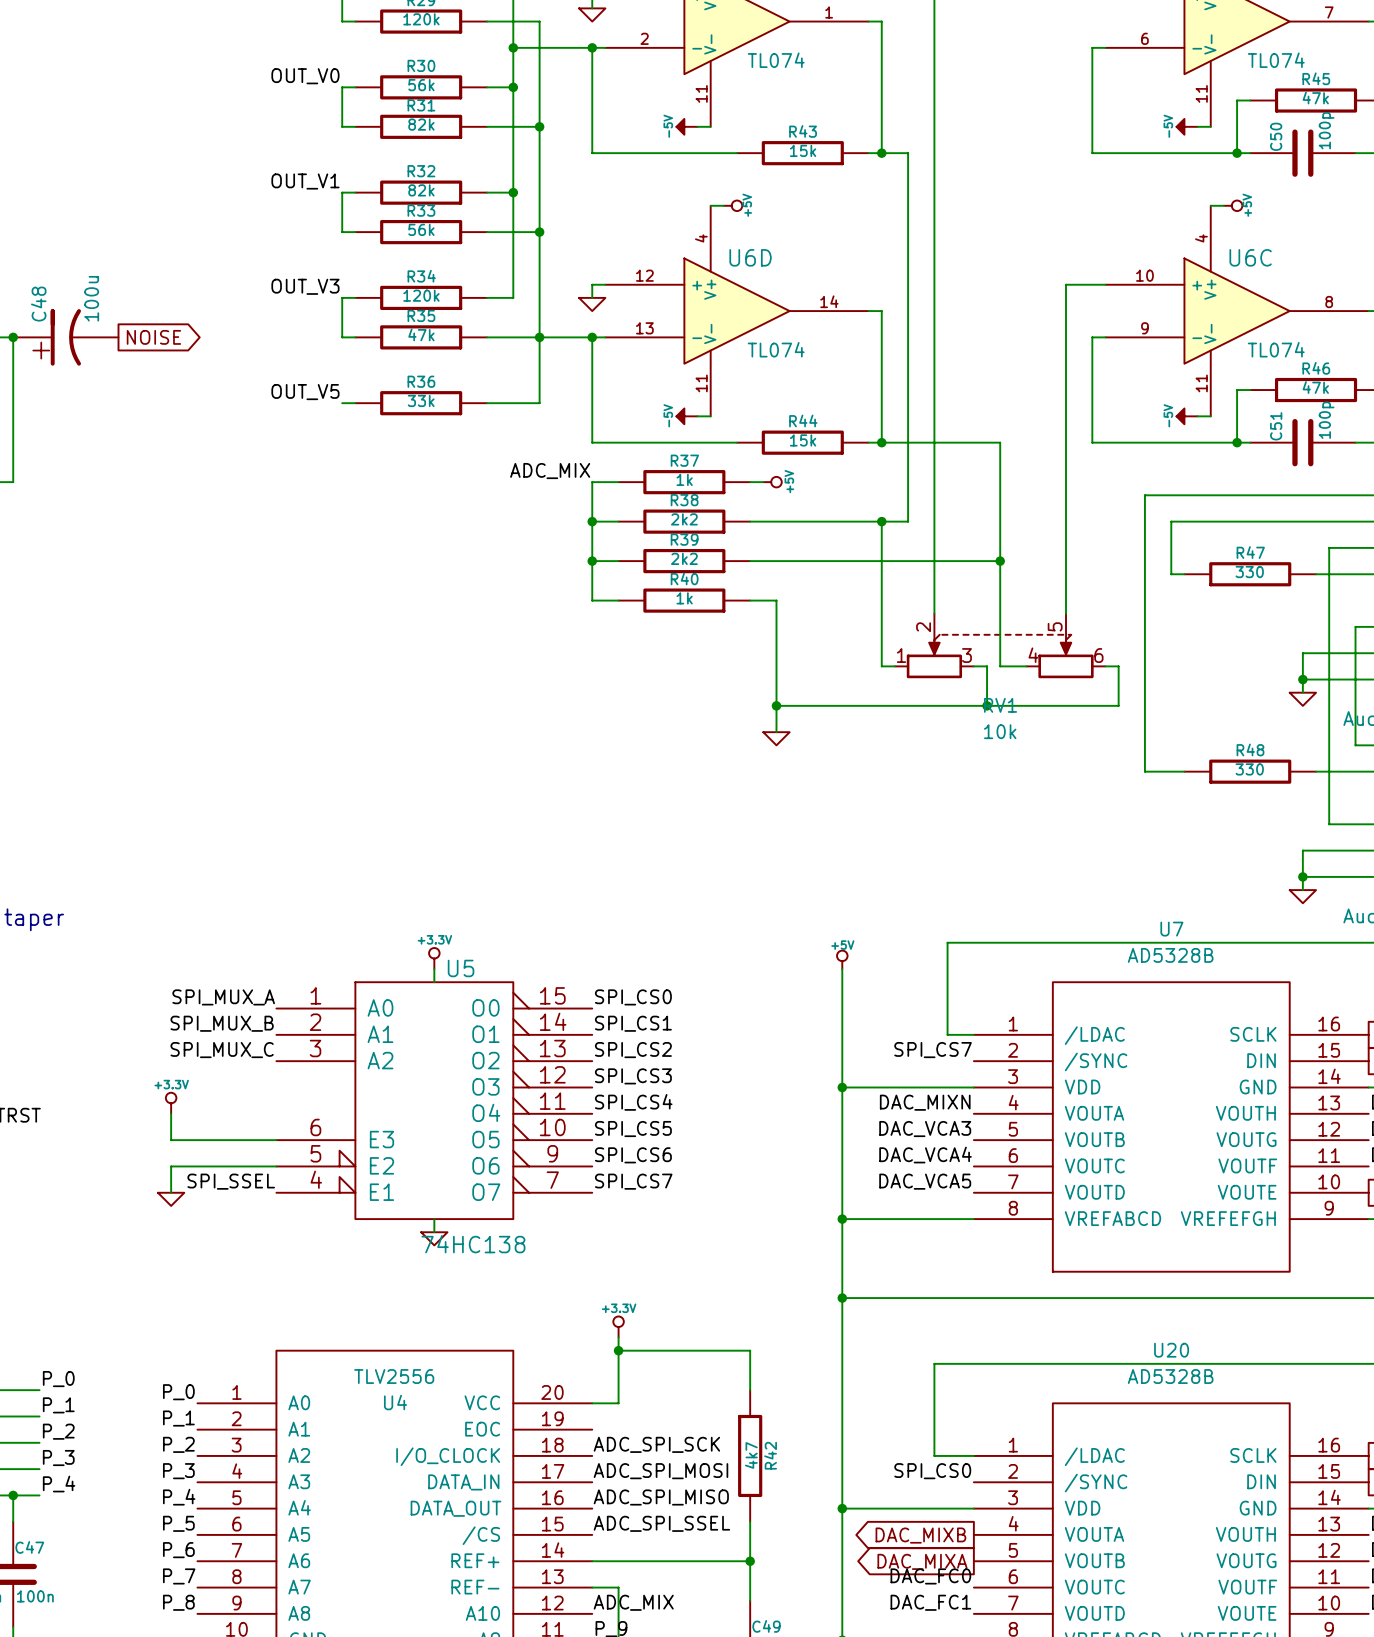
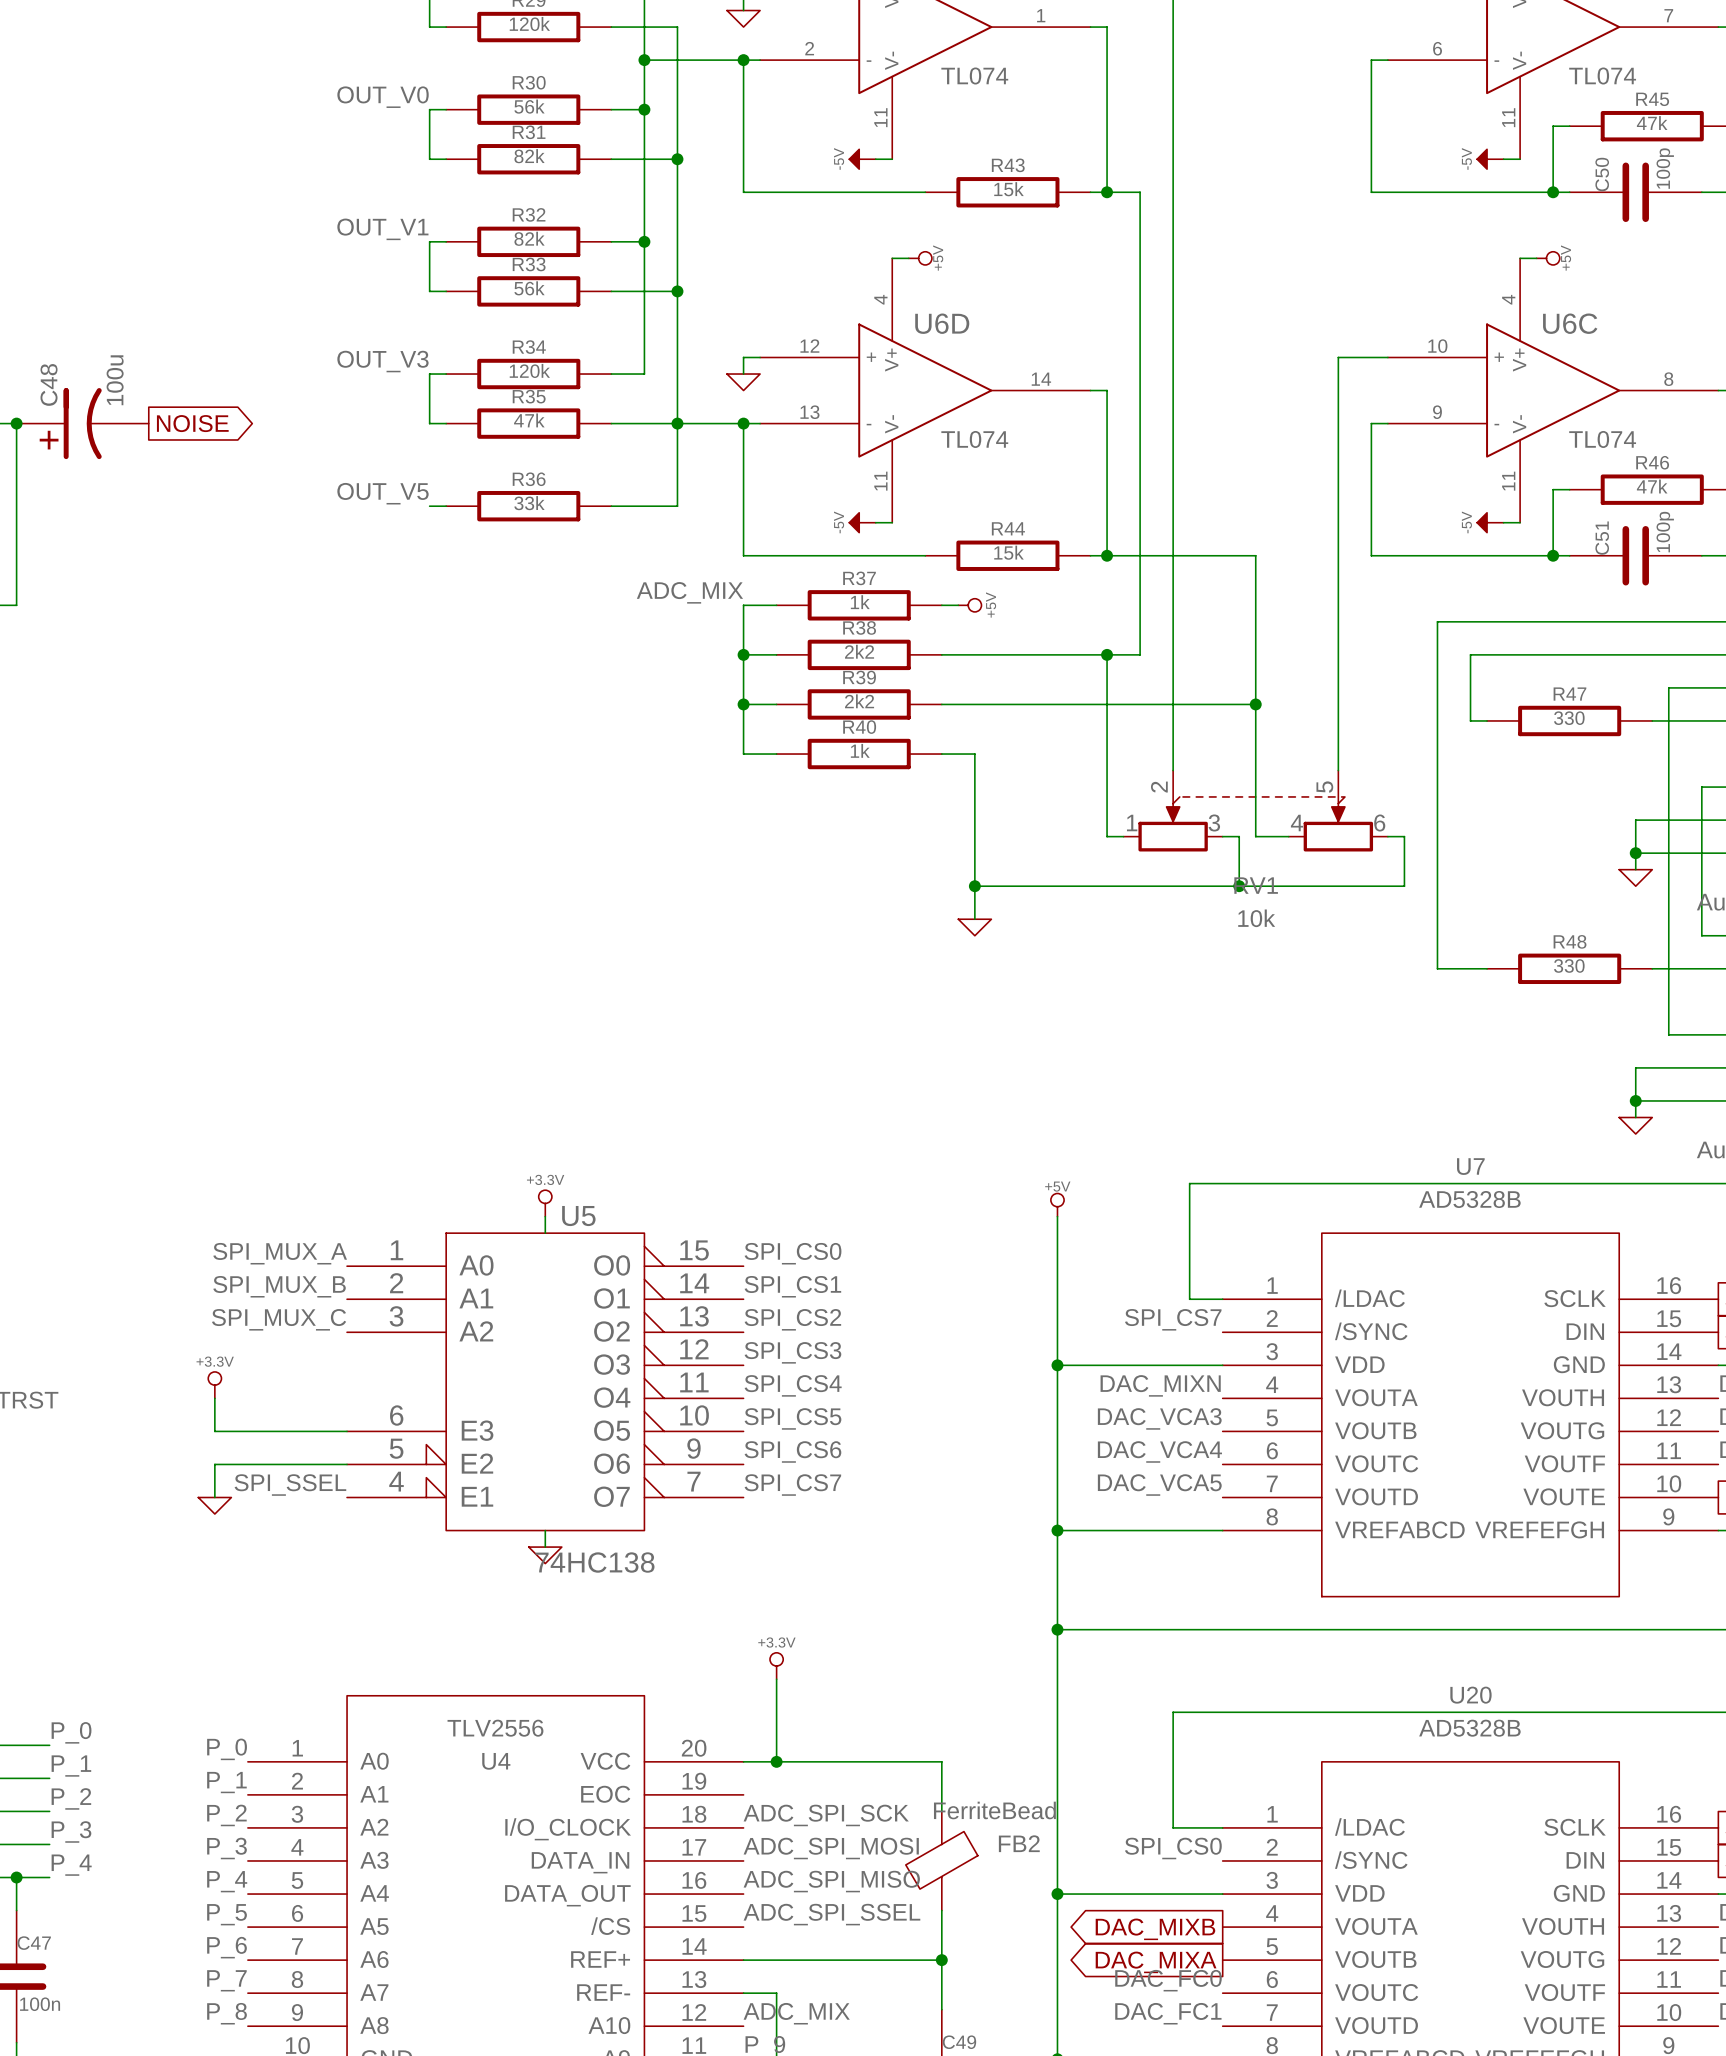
wire: (618, 1350) (750, 1350) (750, 1390) -> (776, 1761) (941, 1761) (941, 1811)
junction position: (618, 1350) -> (776, 1761)
R42: 4k7 (750, 1455) -> none
FB2: none -> FerriteBead (941, 1860)

